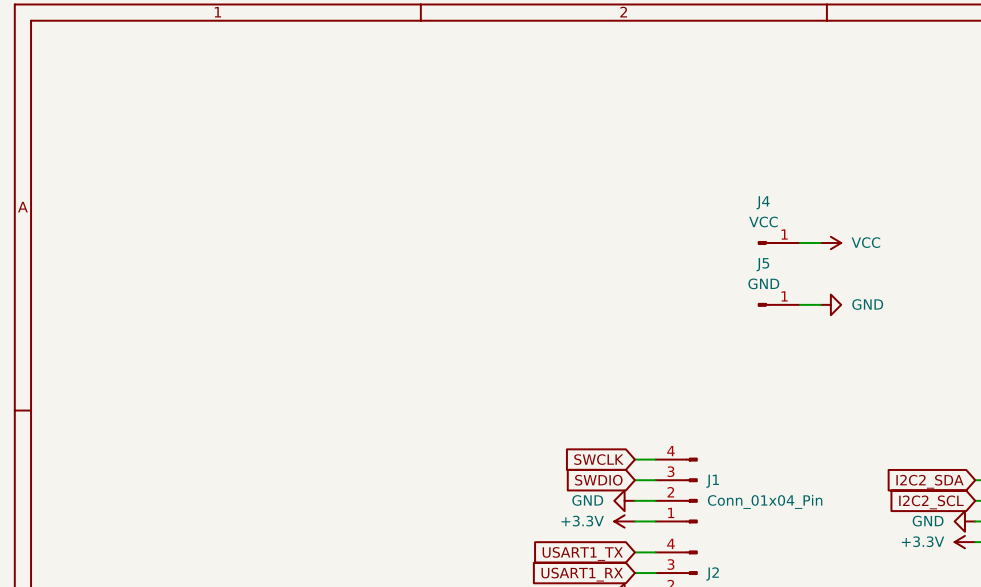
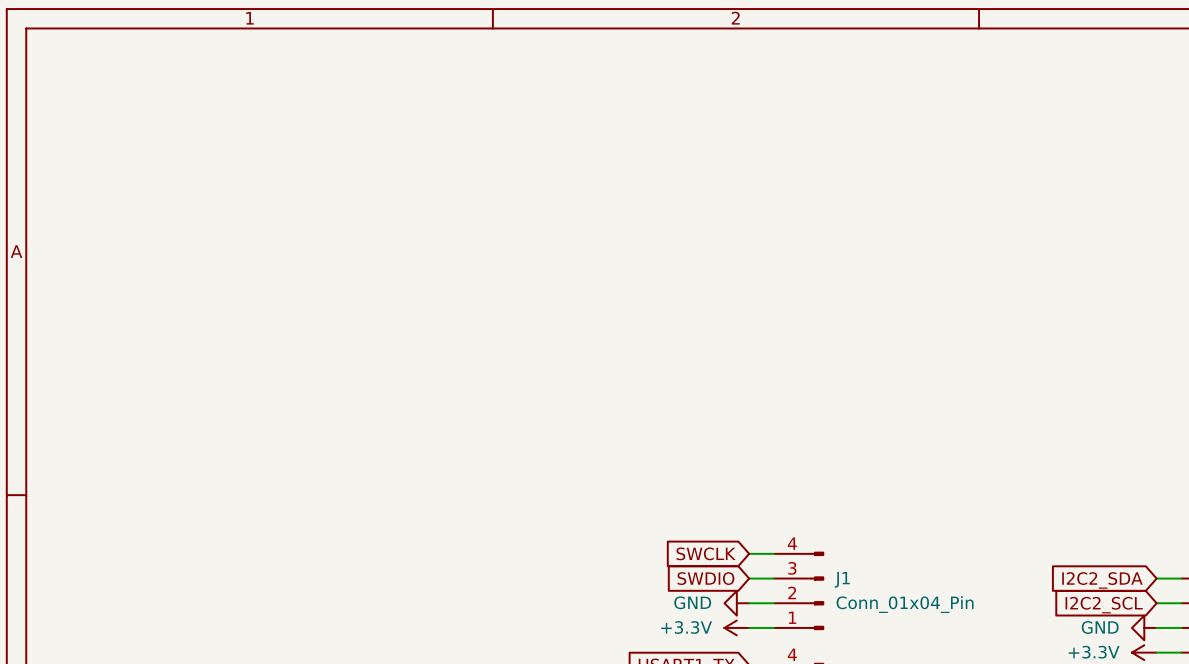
J4: VCC (779, 242) -> none
wire: (799, 242) (820, 242) -> none
power symbol: VCC (830, 242) -> none
J5: GND (779, 304) -> none
wire: (799, 304) (820, 304) -> none
power symbol: GND (830, 304) -> none

